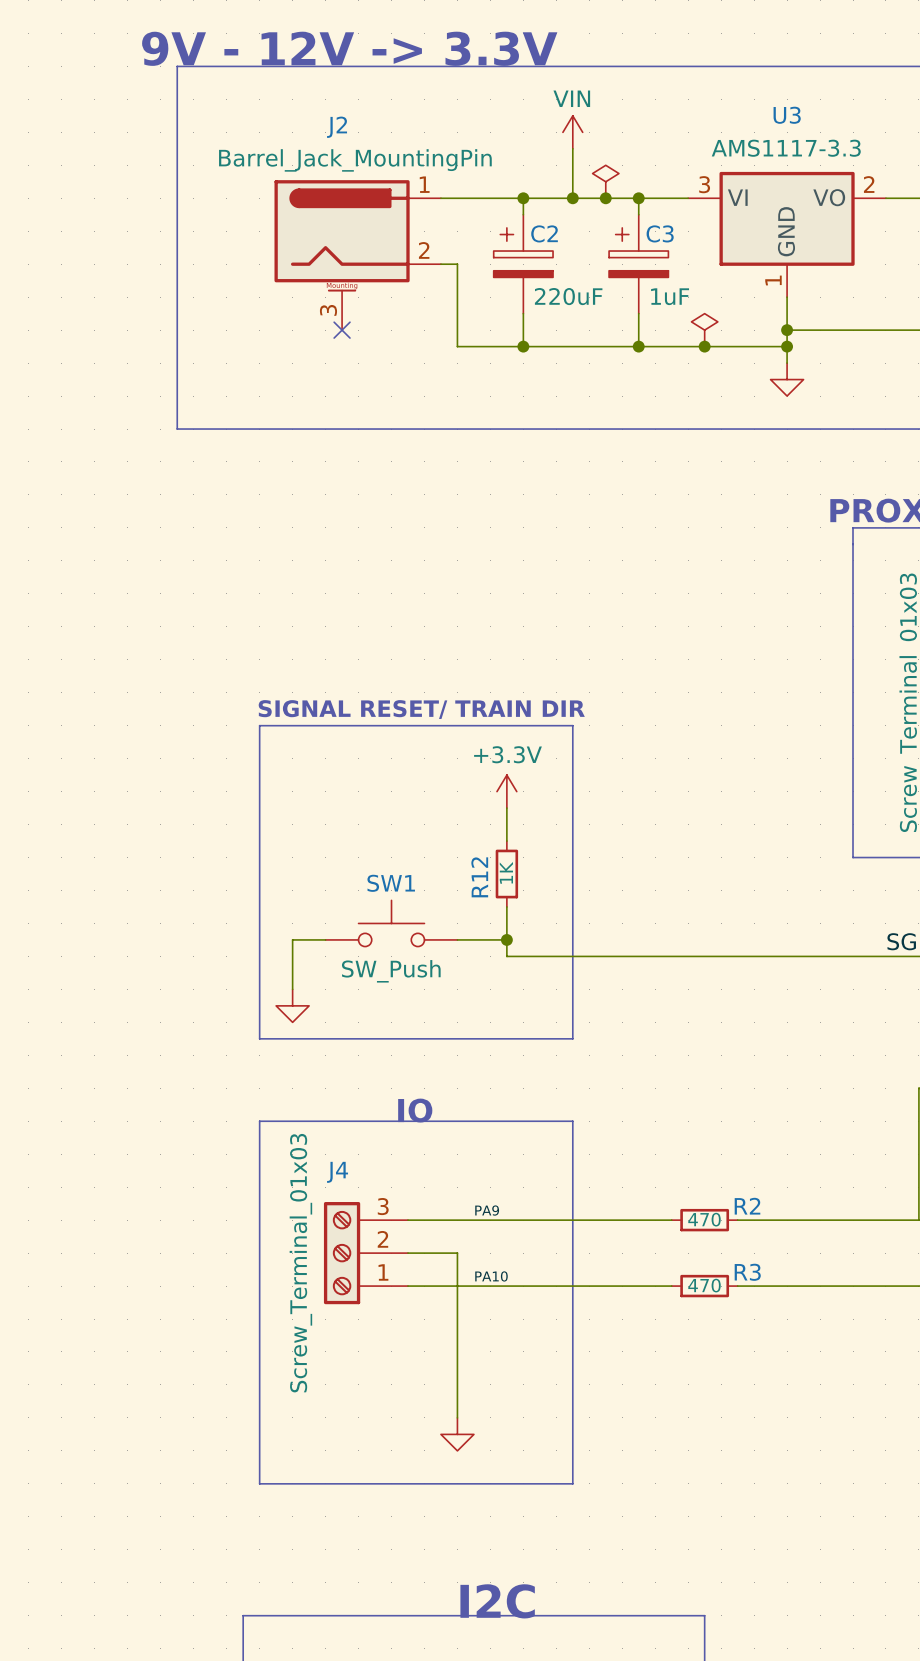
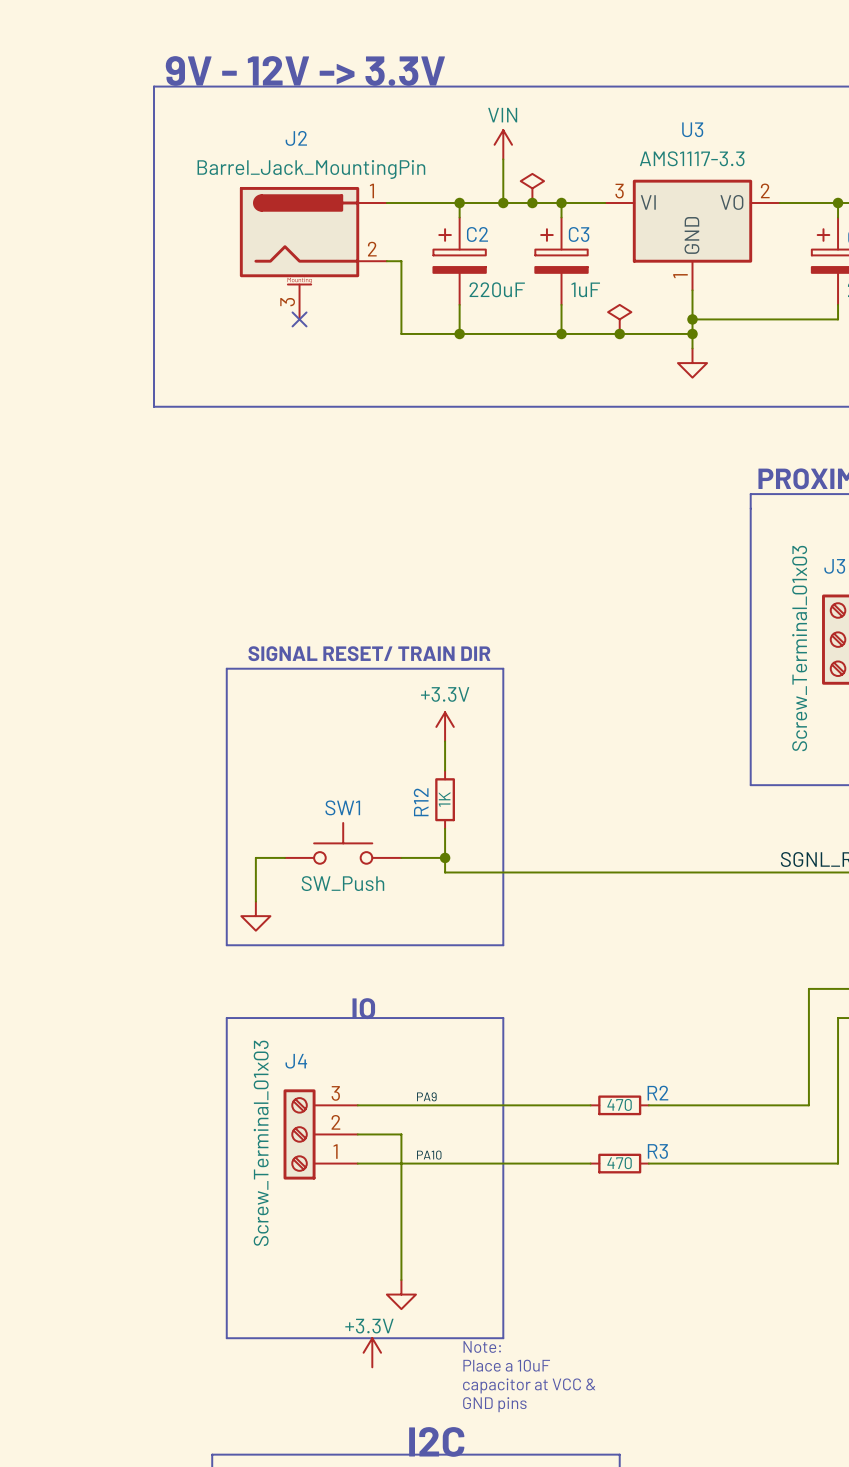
text: none -> Note: (482, 1346)
power symbol: none -> +3.3V (372, 1352)
text: none -> Place a 10uF (506, 1365)
text: none -> capacitor at VCC & (529, 1385)
text: none -> GND pins (494, 1404)

